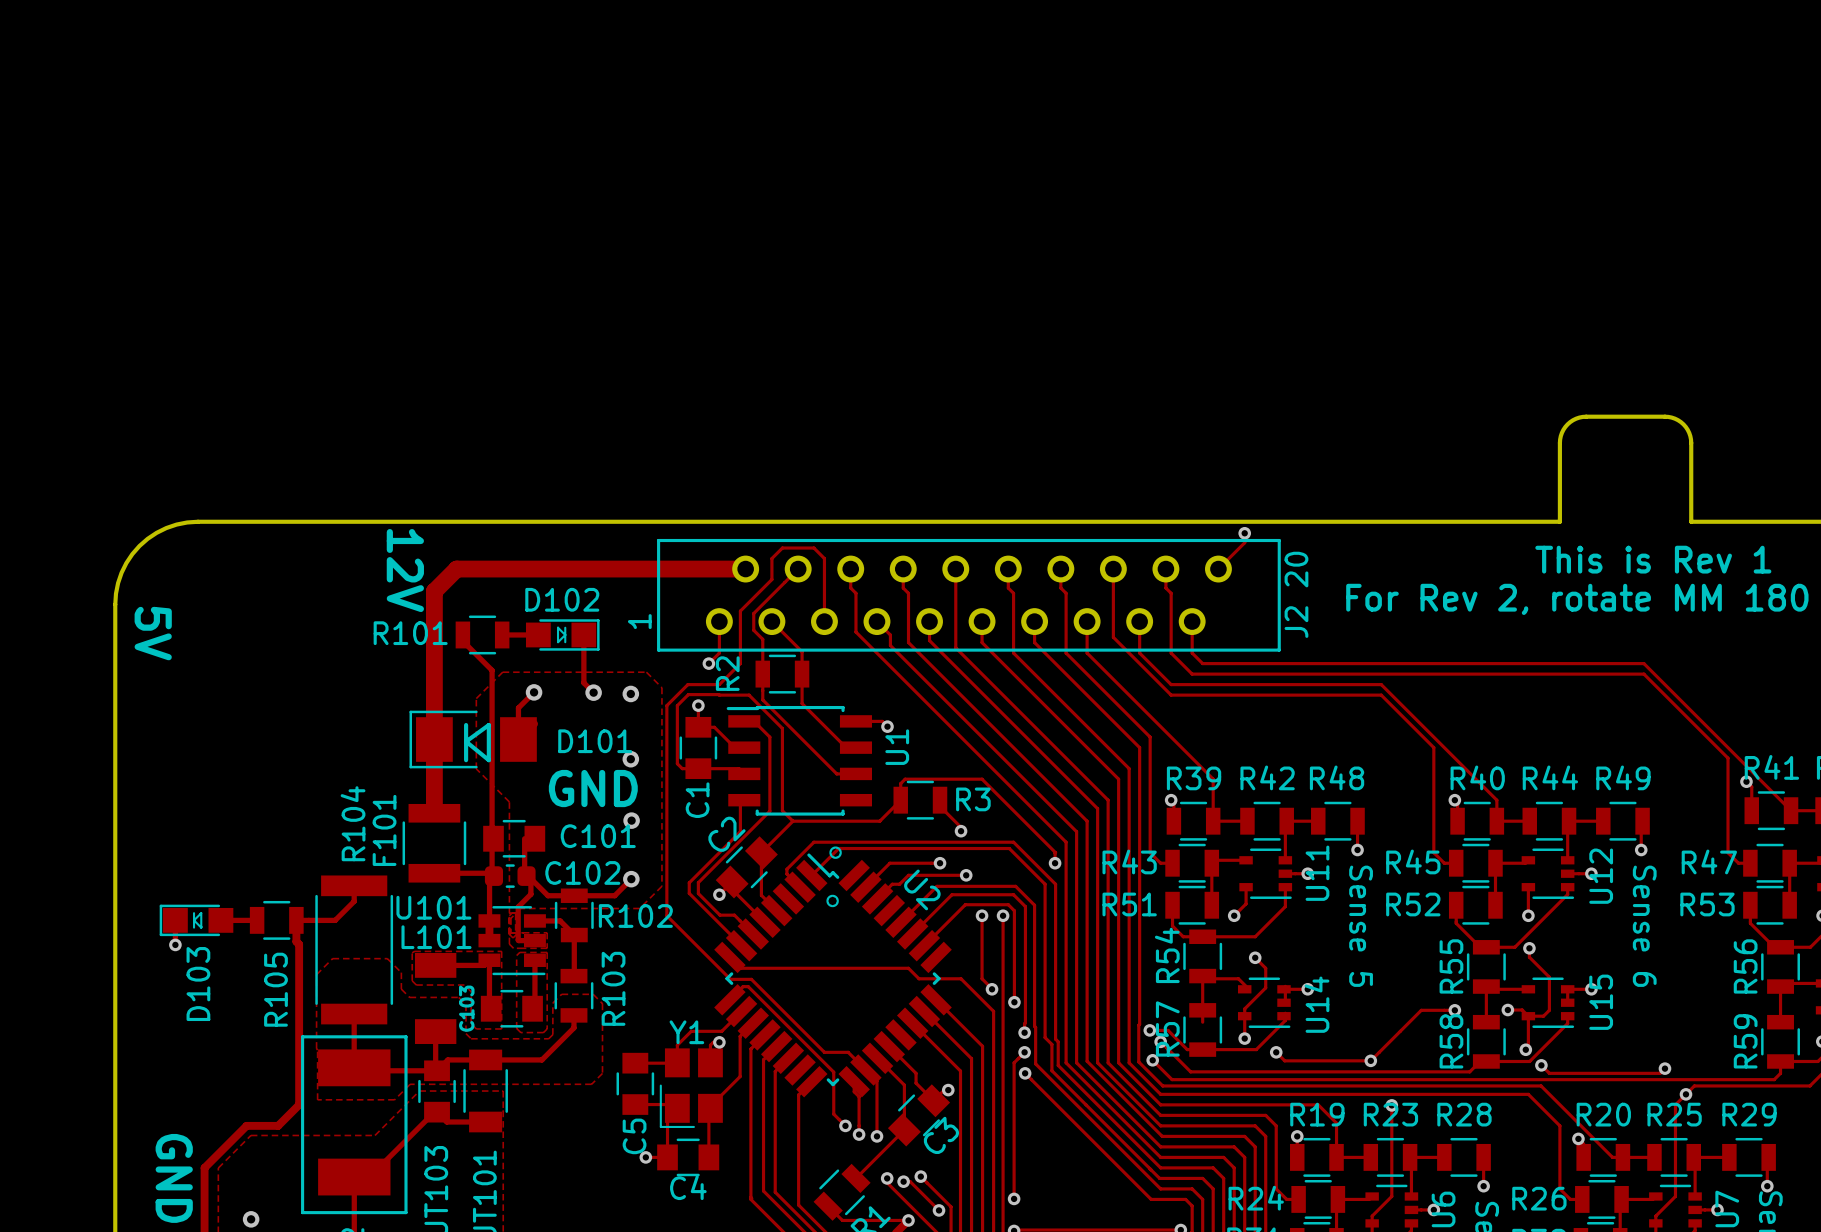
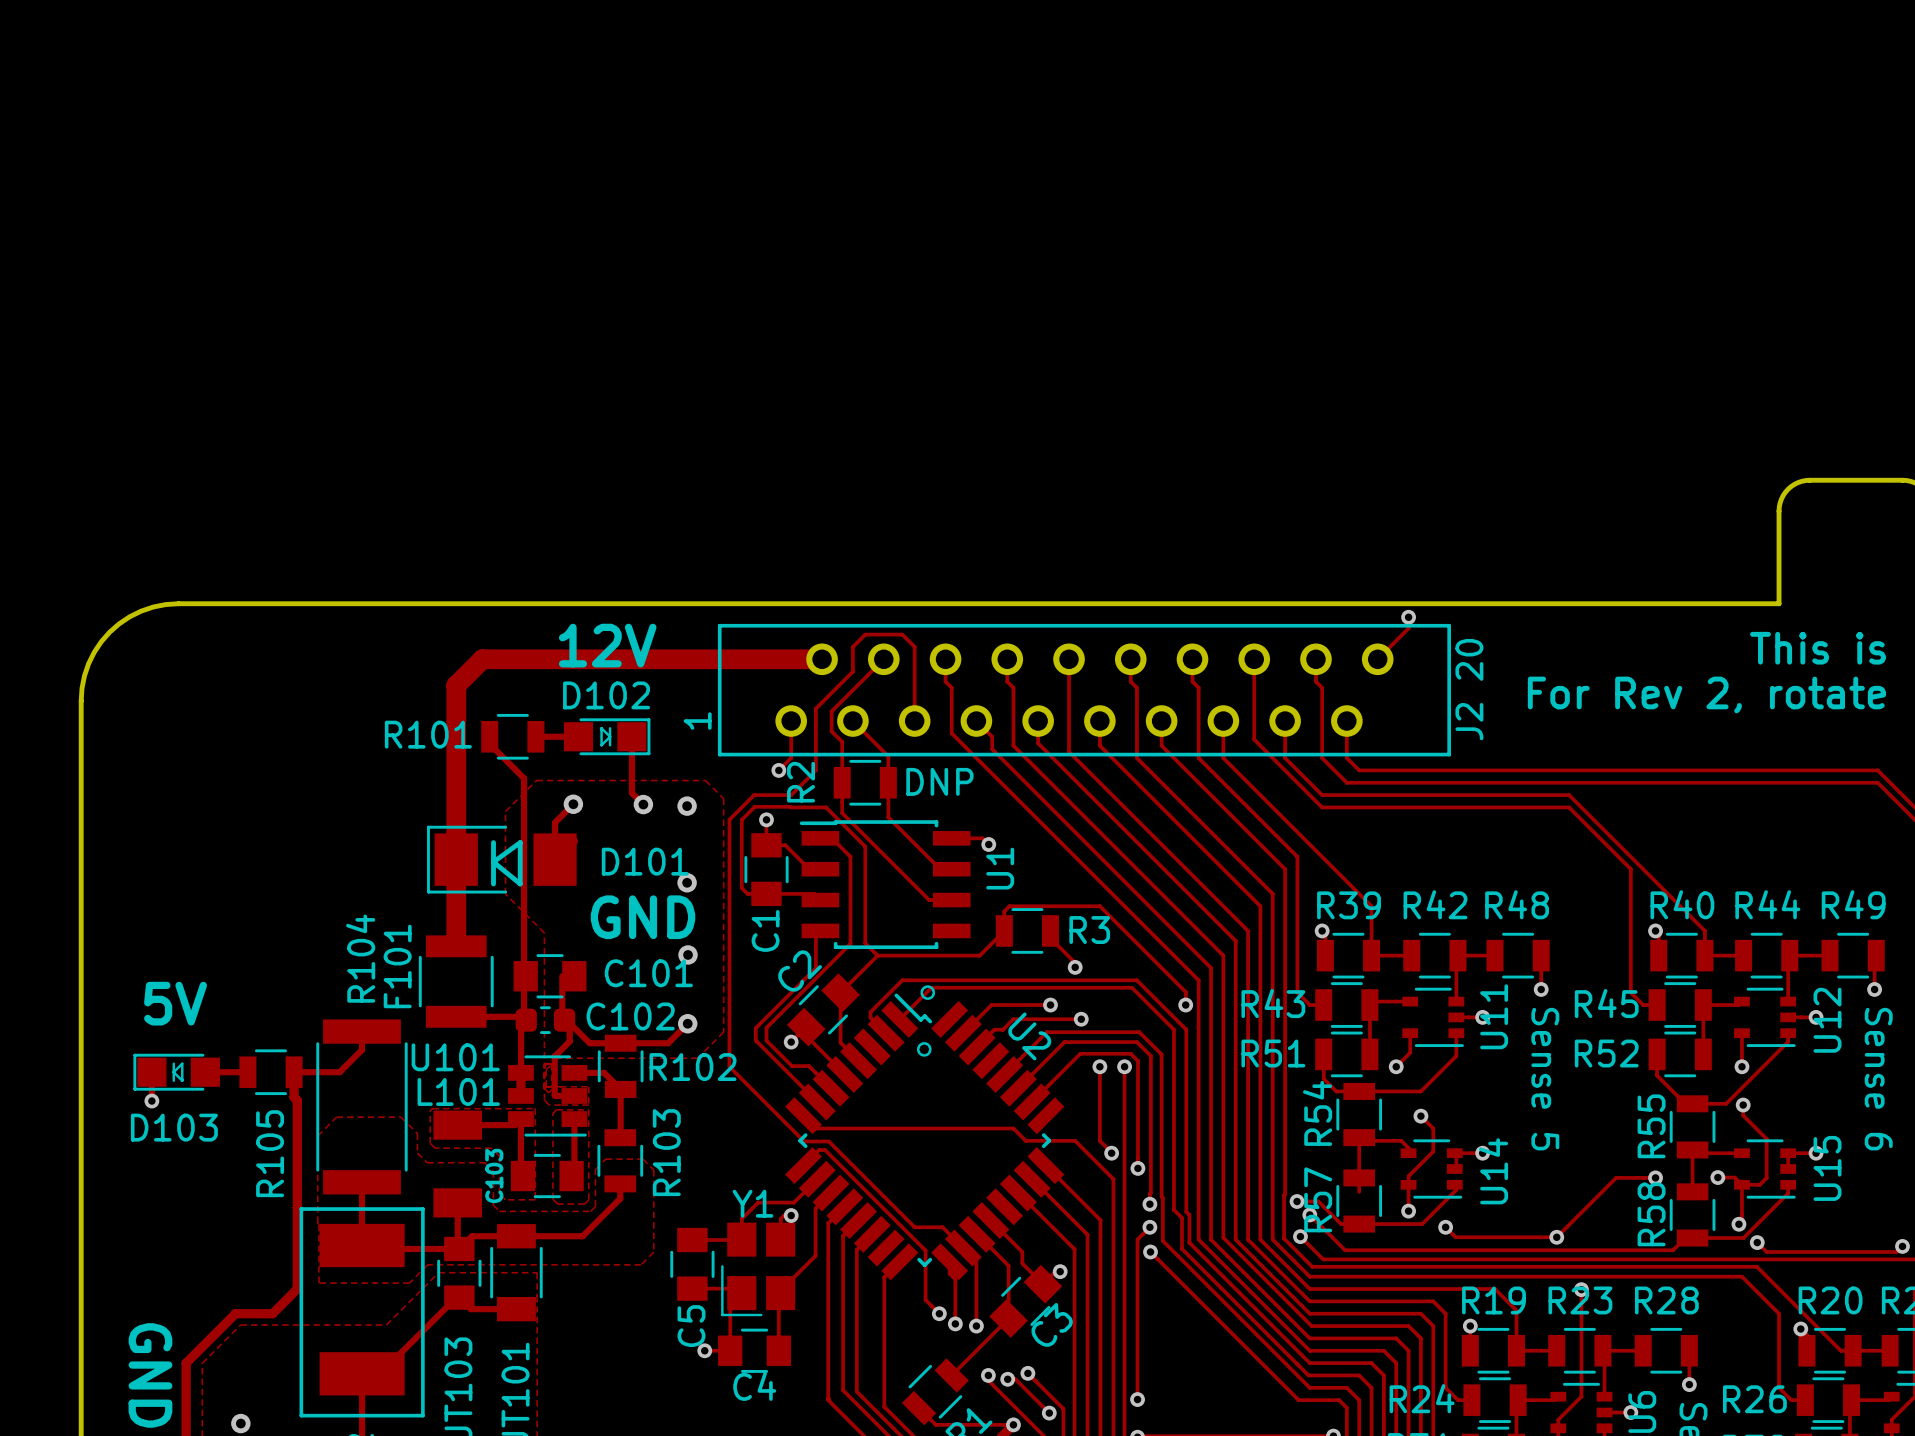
text rotation: 0° (405, 570) -> 90° counterclockwise (607, 645)
text position: 12V (405, 570) -> 12V (607, 645)
text rotation: 0° (153, 633) -> 90° counterclockwise (175, 1003)
text position: 5V (153, 633) -> 5V (175, 1003)
text: none -> DNP (939, 781)
D103 name rotation: 0° (198, 984) -> 90° clockwise (174, 1127)

